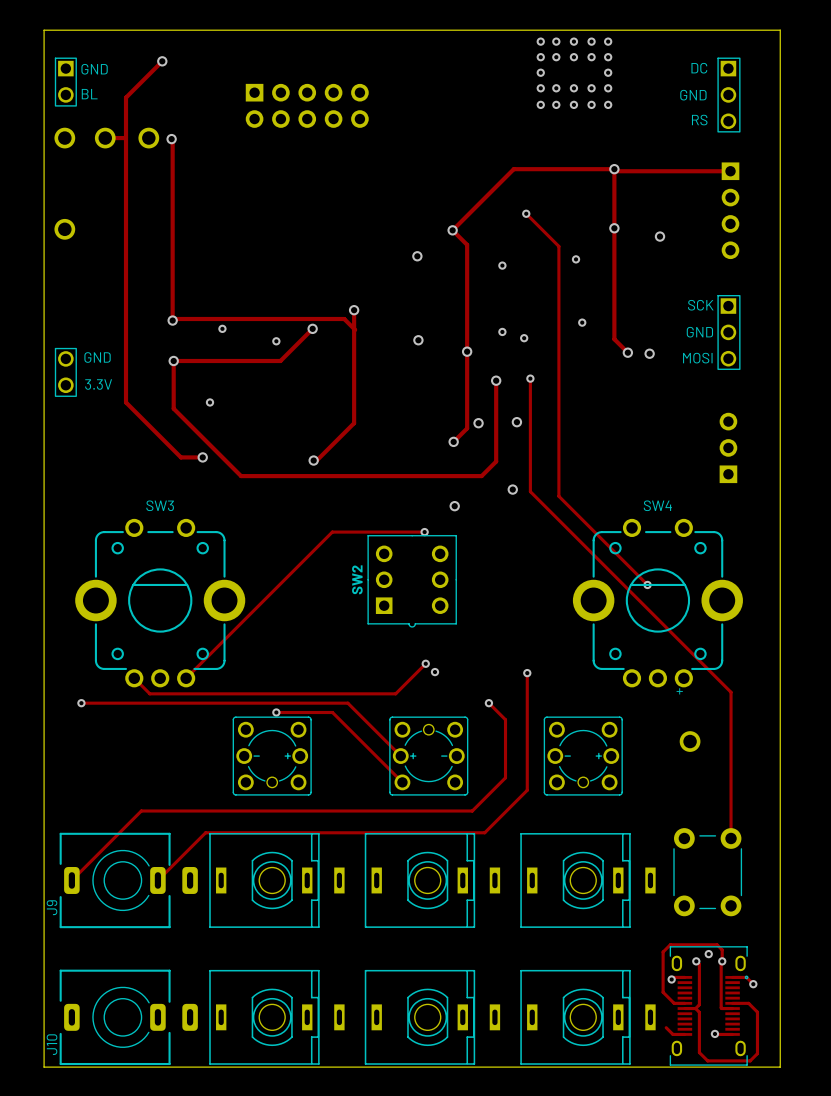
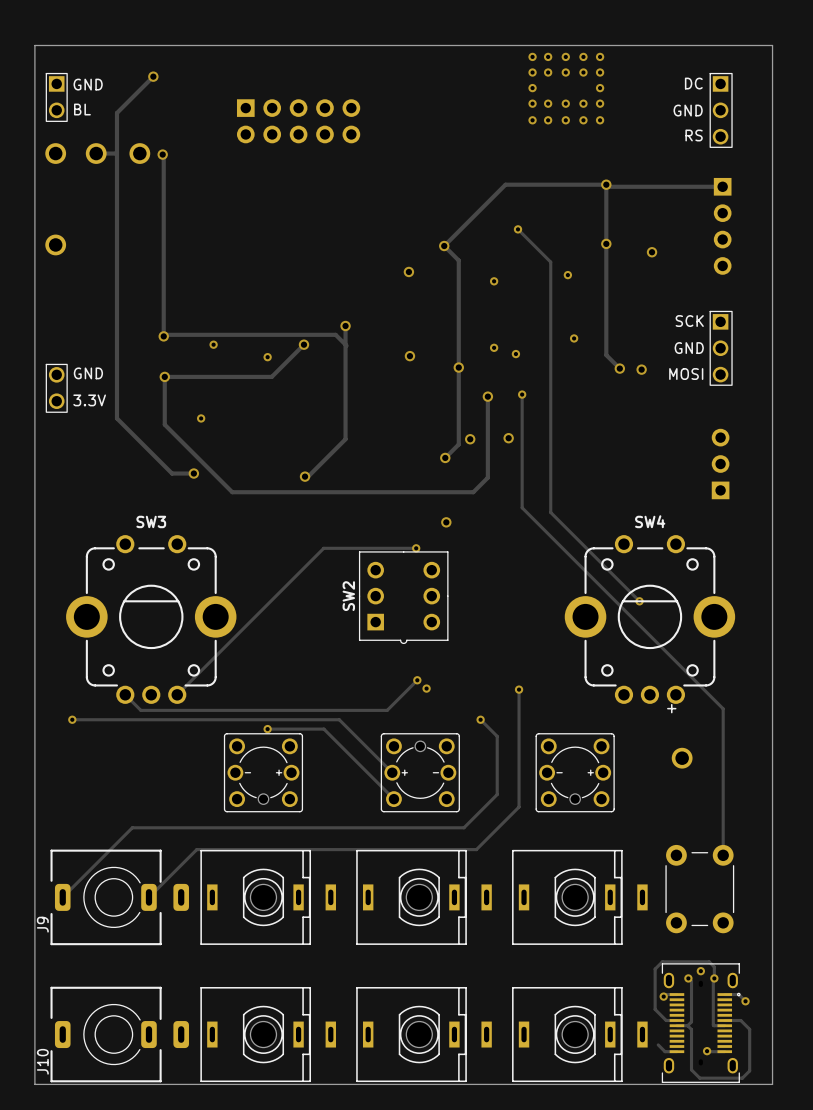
via: (512, 489) -> none

